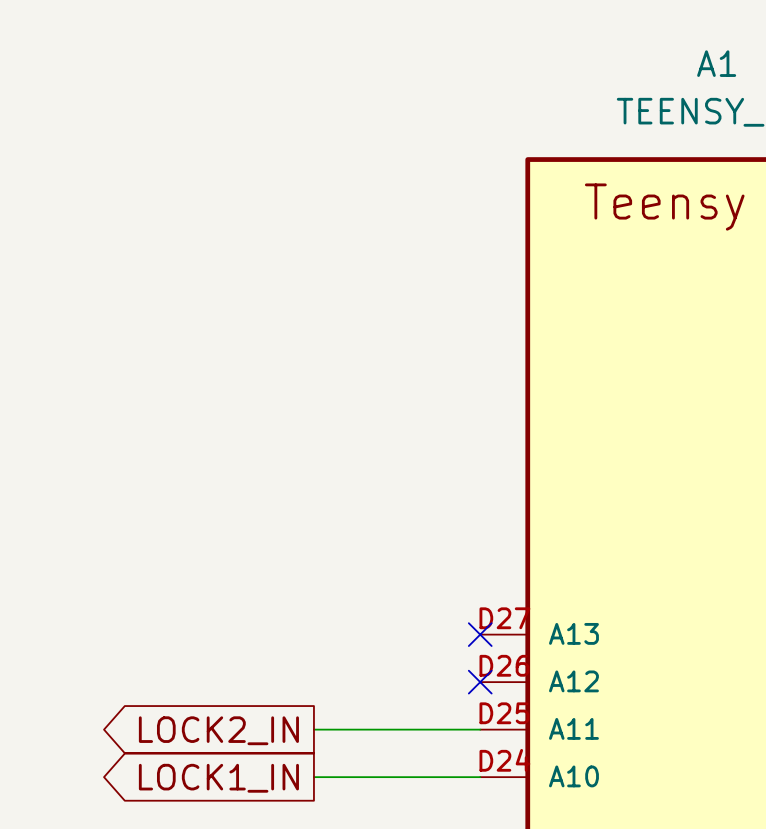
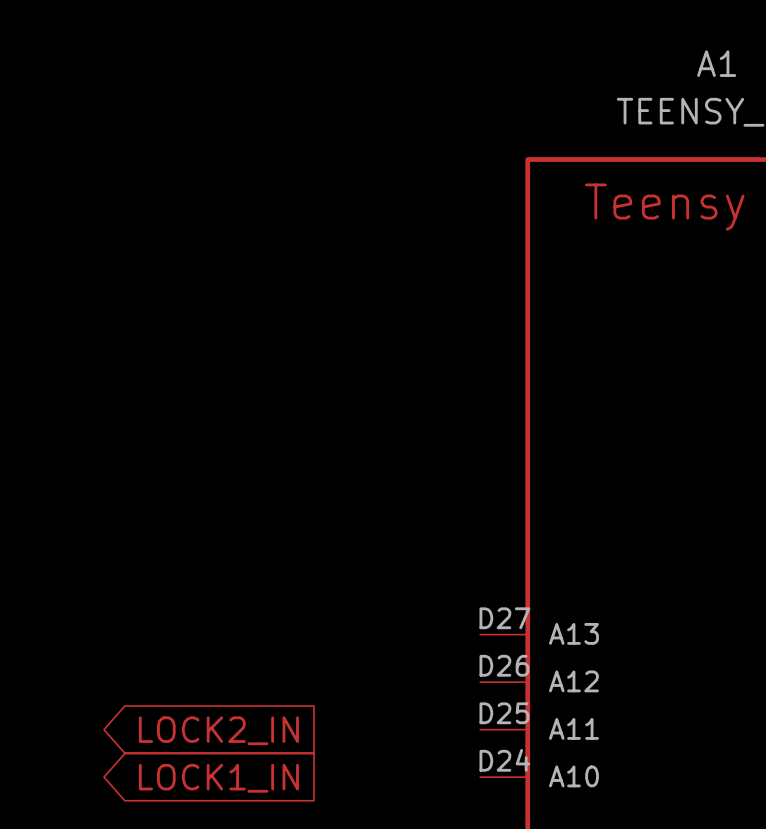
no-connect mark: (480, 634) -> none
no-connect mark: (480, 682) -> none
wire: (313, 729) (480, 729) -> none
wire: (313, 777) (480, 777) -> none

